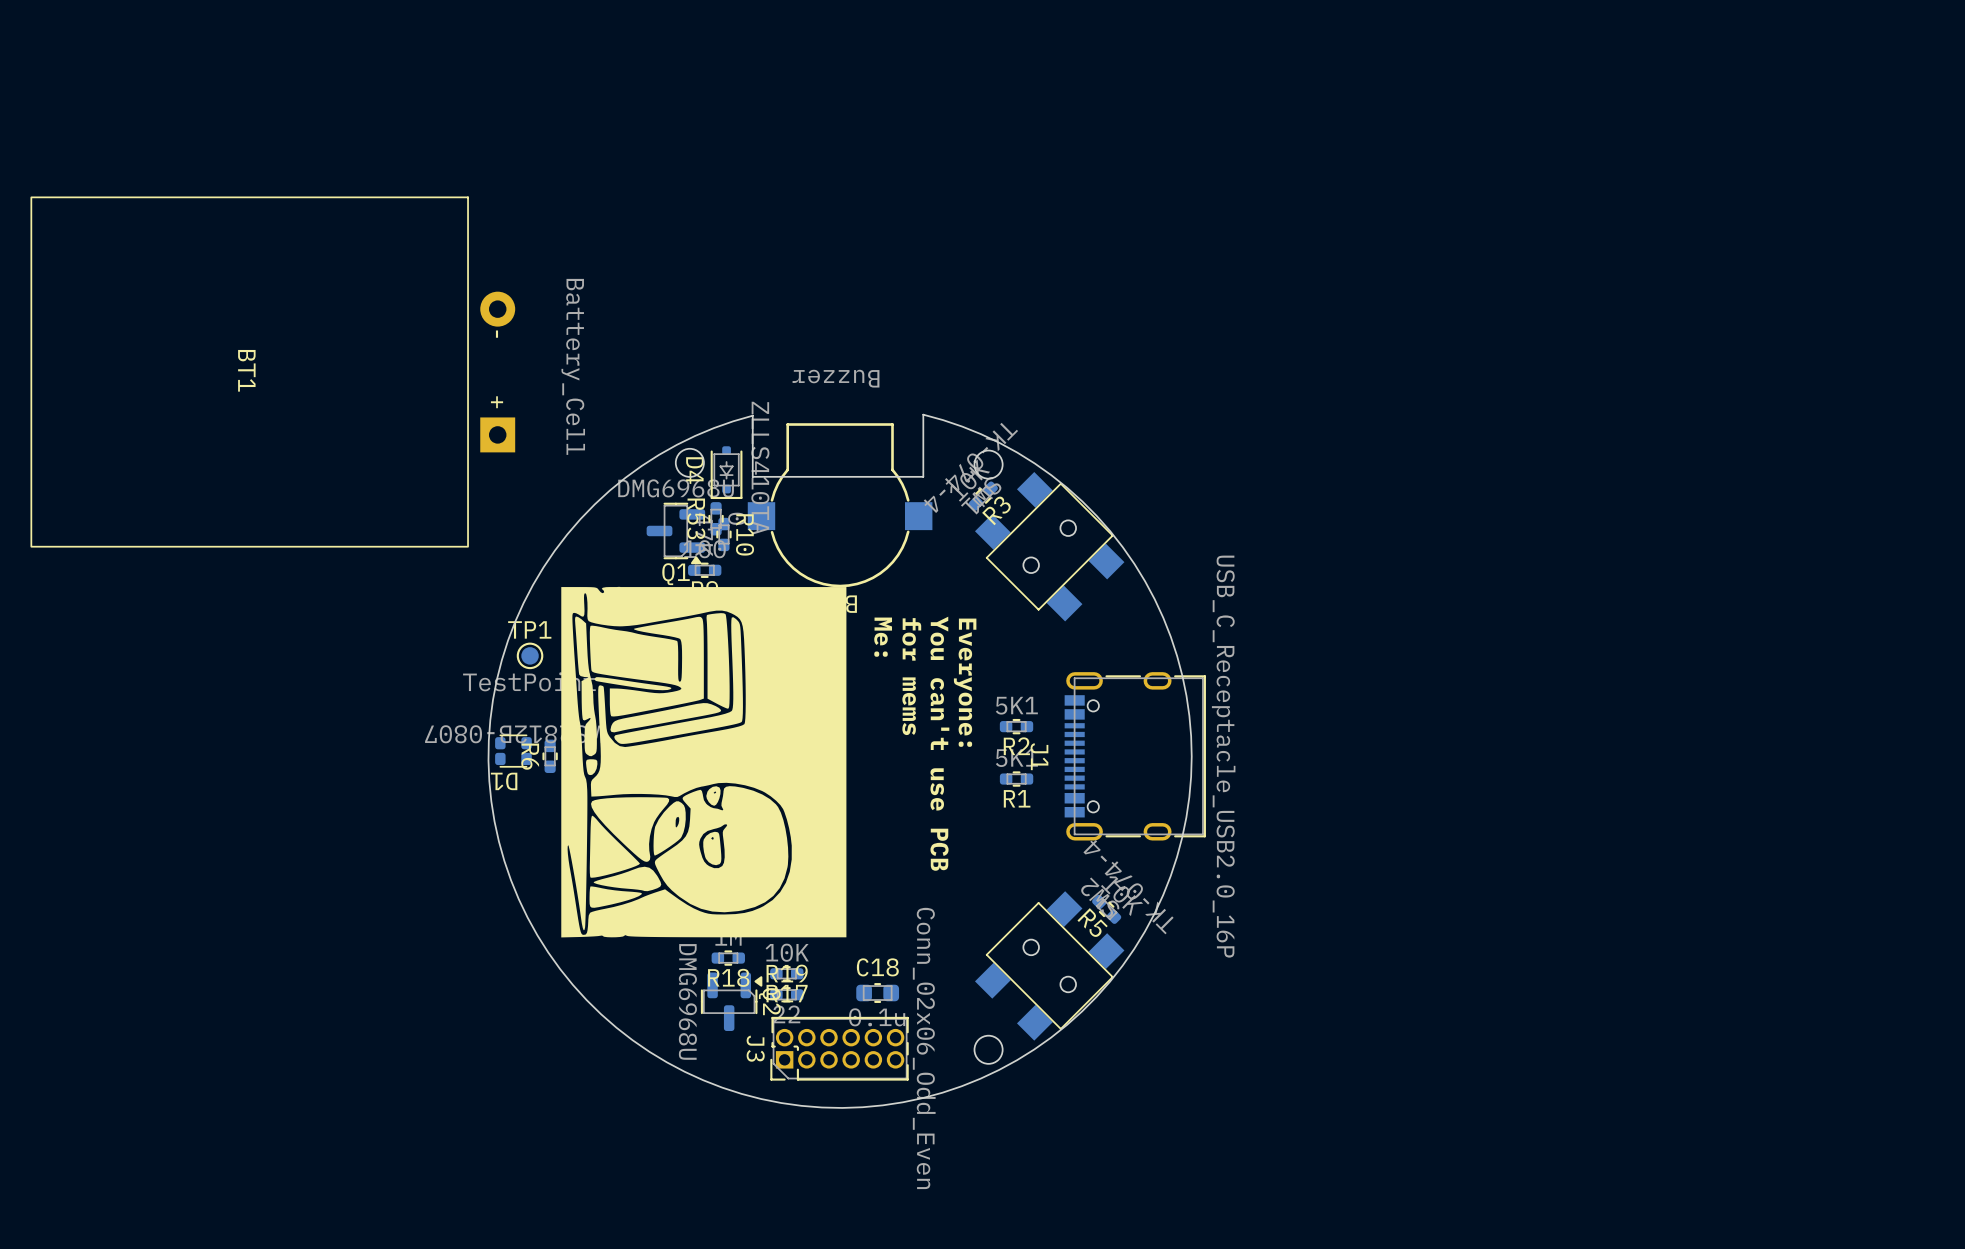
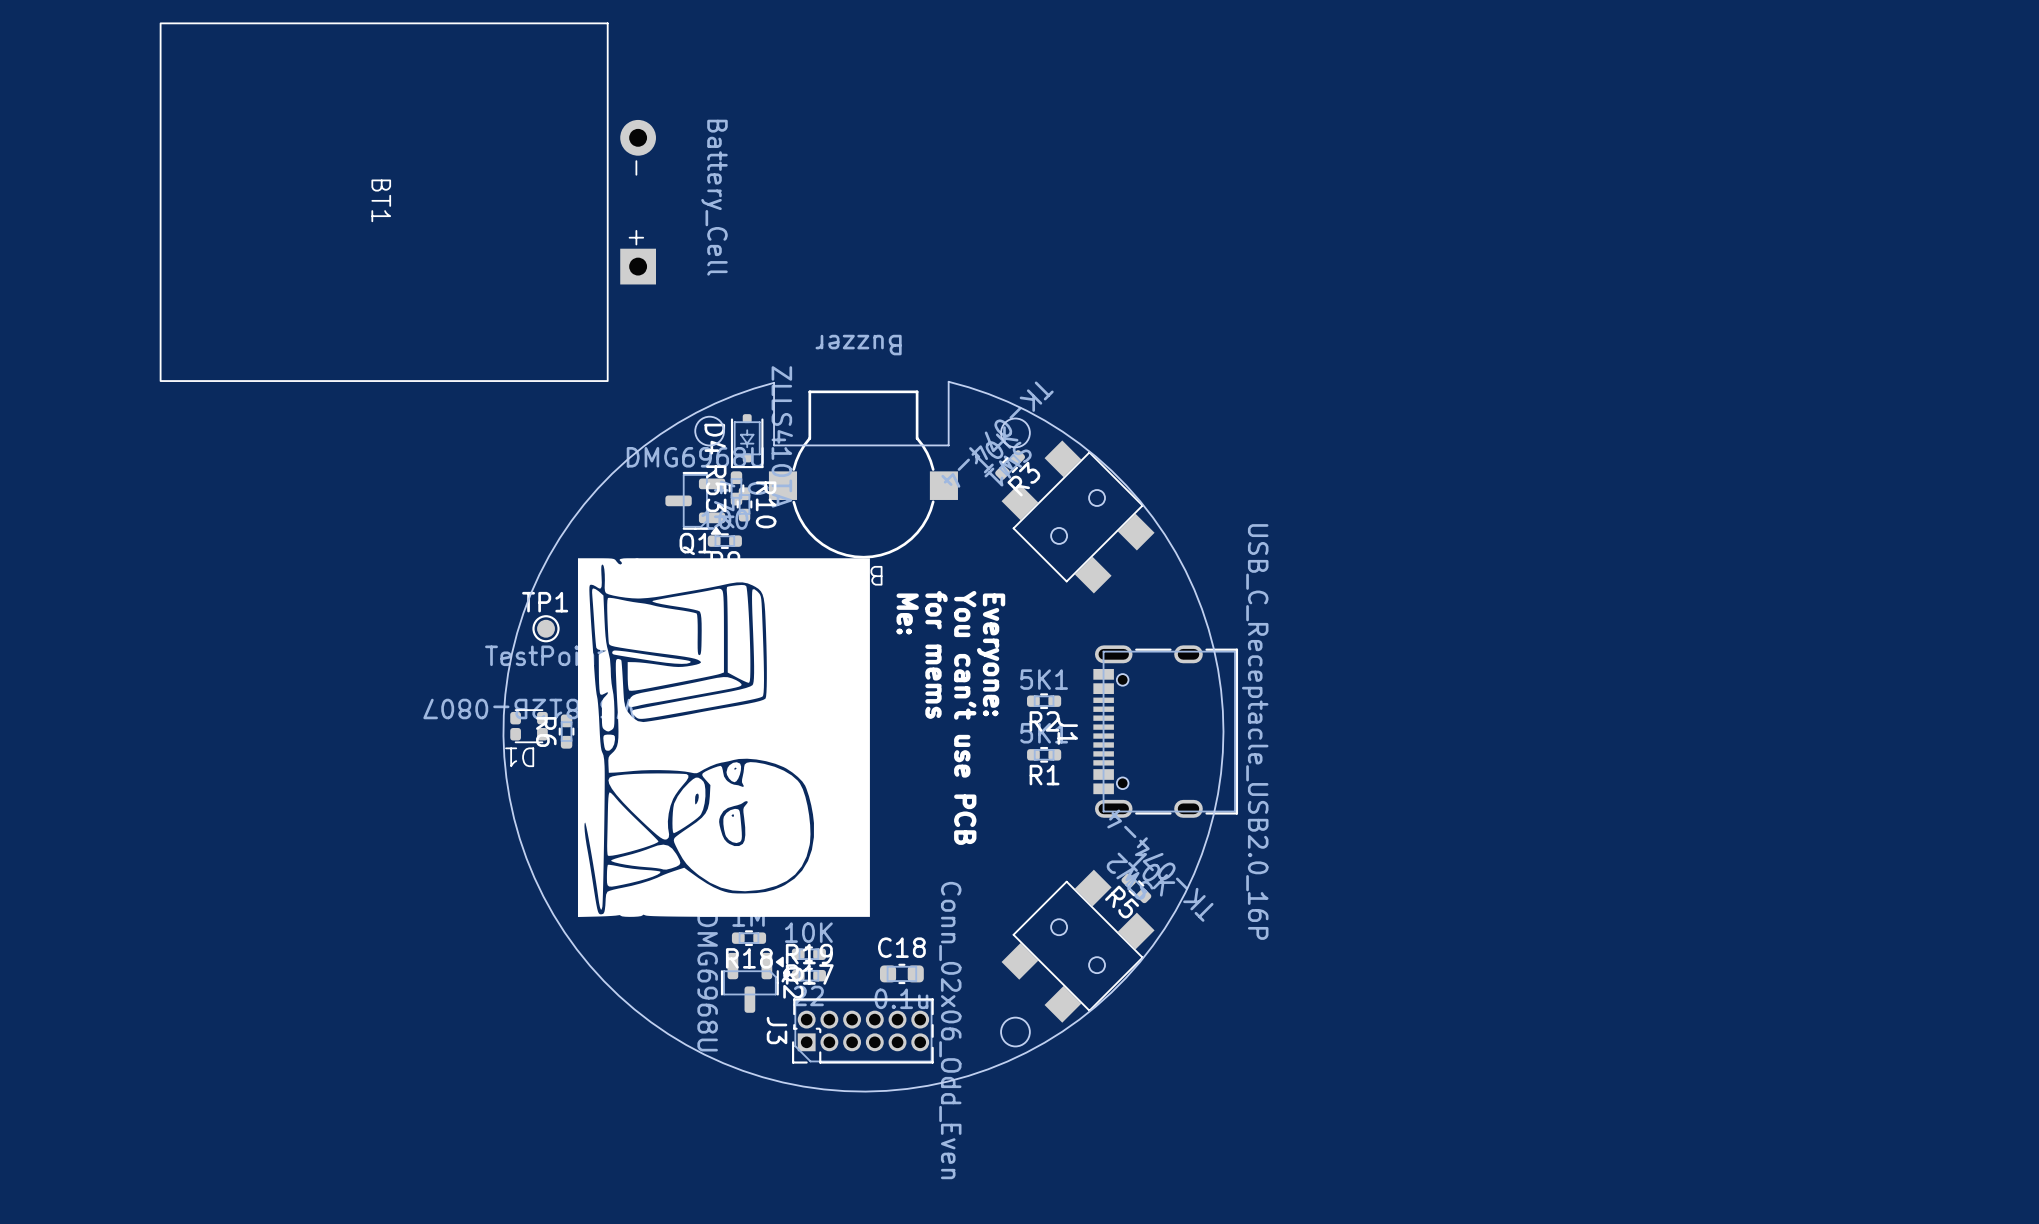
BT1 position: (272, 372) -> (407, 202)

